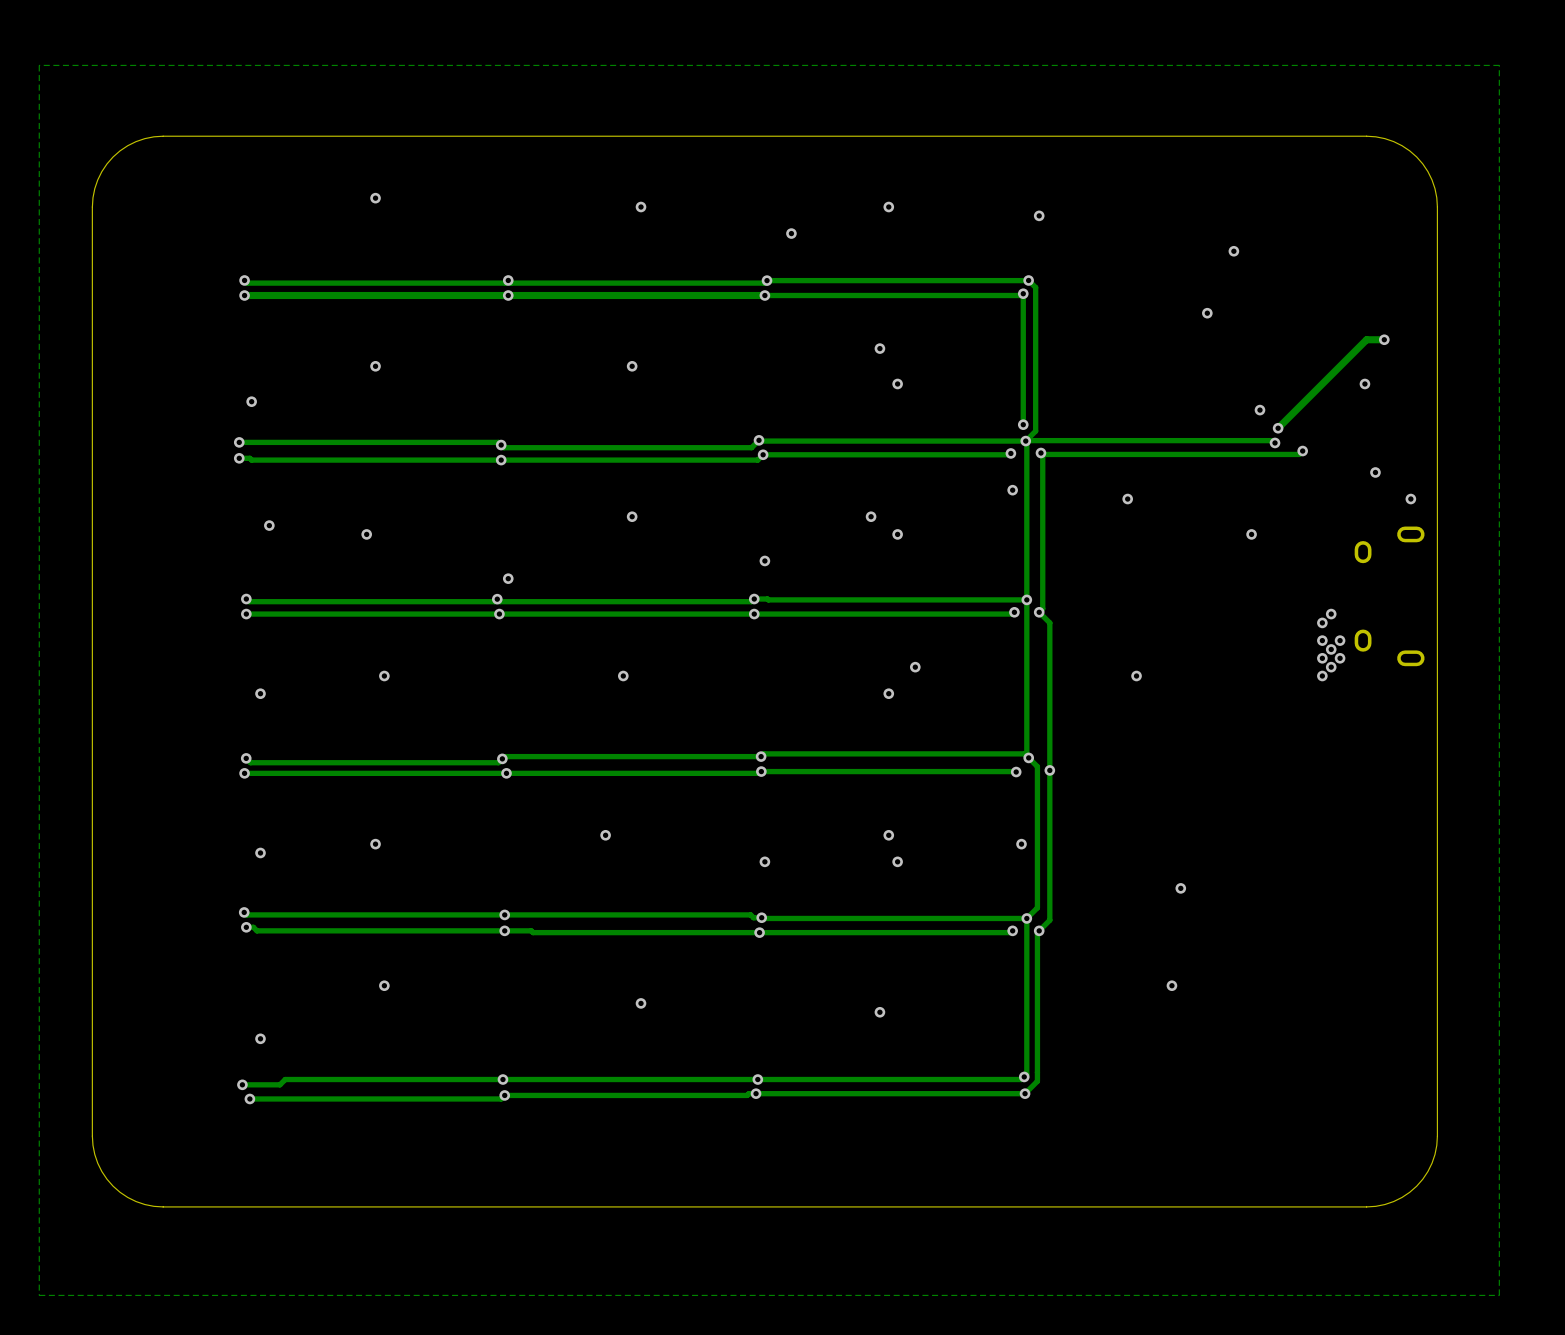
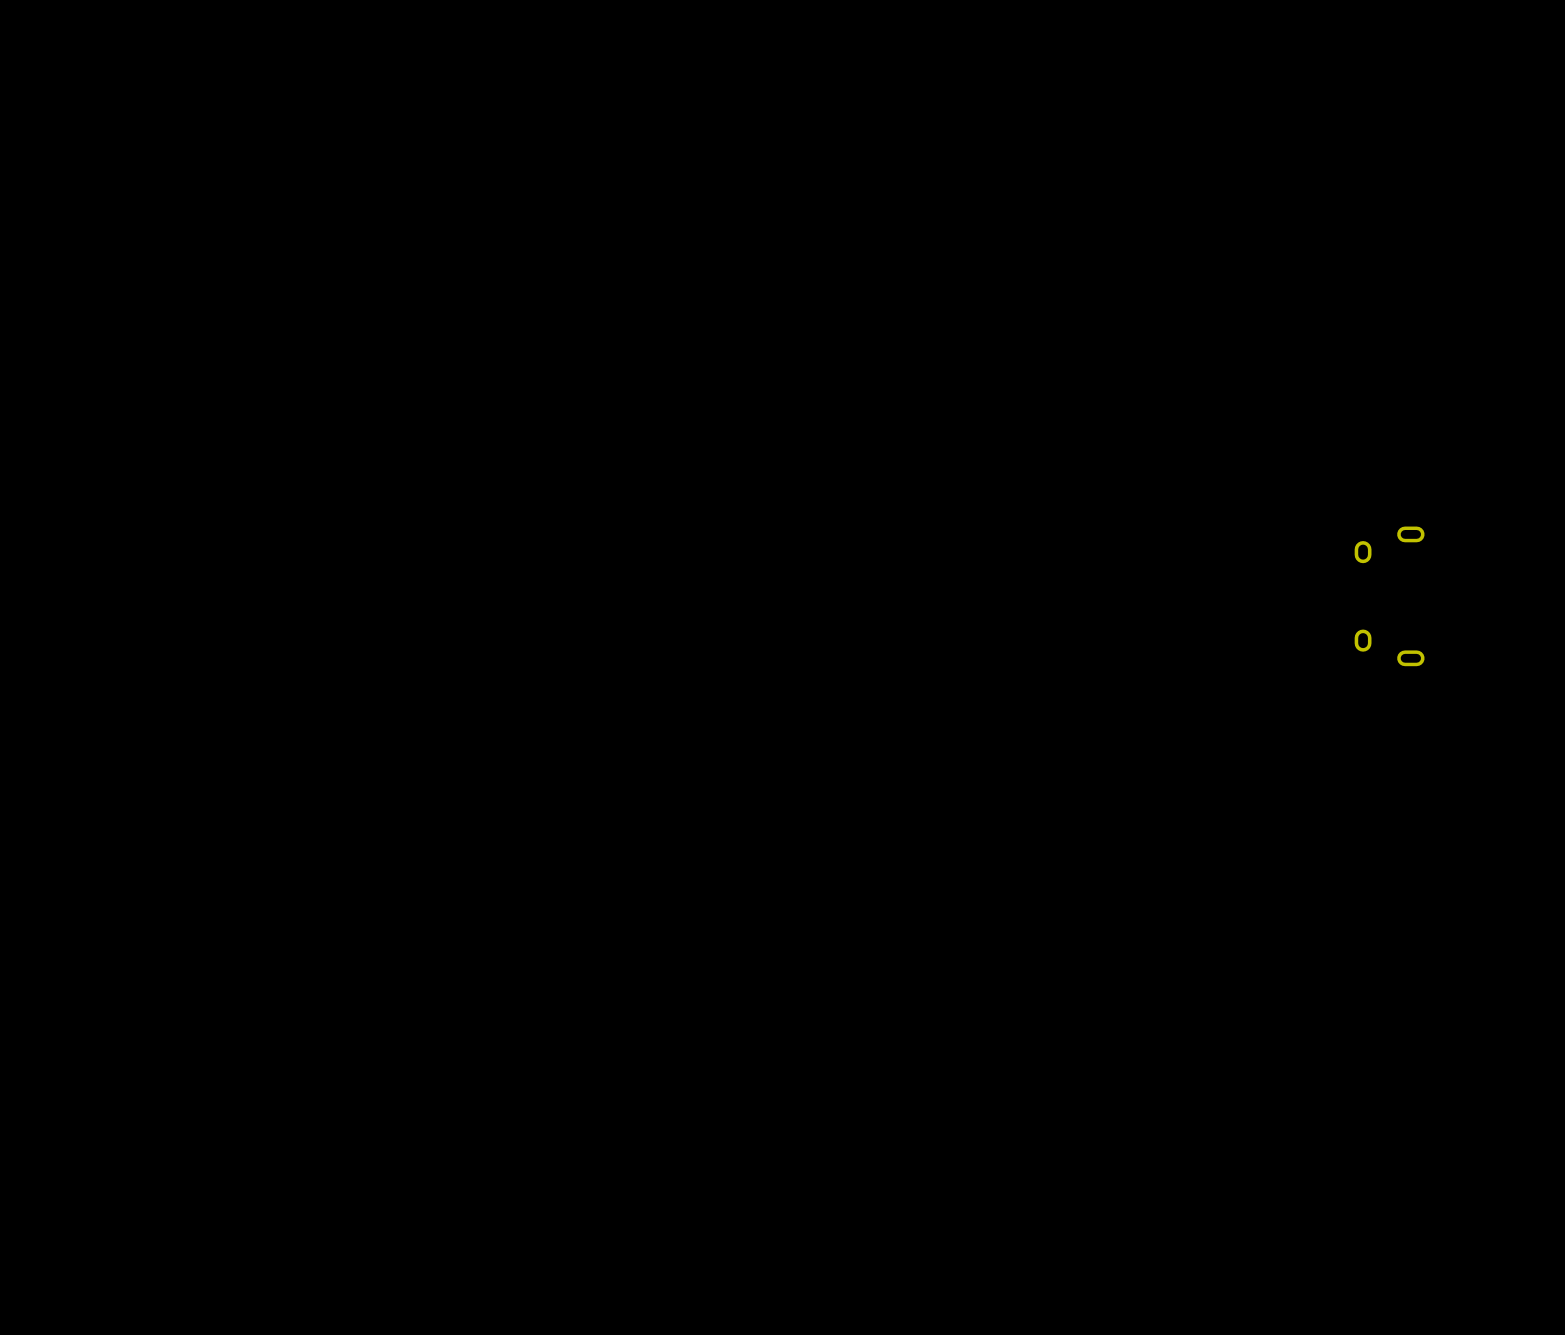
zone outline: (1499, 65) (39, 65) (39, 1295) (1499, 1295) (1499, 65) -> none
board edge: (1366, 136) (163, 136) (144, 138) (120, 150) (107, 163) (97, 179) (92, 207) (92, 1136) (94, 1154) (107, 1179) (120, 1192) (136, 1201) (163, 1206) (1366, 1206) (1384, 1204) (1409, 1192) (1422, 1179) (1432, 1163) (1437, 1136) (1437, 207) (1432, 179) (1416, 156) (1393, 141) (1366, 136) -> none
via: (375, 198) -> none
via: (641, 207) -> none
via: (888, 207) -> none
via: (1039, 215) -> none
via: (791, 233) -> none
via: (1233, 251) -> none
track: (244, 280) (247, 283) (505, 283) (508, 280) (510, 283) (1028, 280) -> none
via: (244, 280) -> none
via: (508, 280) -> none
via: (767, 280) -> none
track: (1028, 280) (1035, 287) (1035, 431) (1025, 441) -> none
via: (1028, 280) -> none
via: (1023, 293) -> none
track: (244, 295) (1021, 295) (1023, 293) (1023, 424) -> none
via: (244, 295) -> none
via: (508, 295) -> none
via: (764, 295) -> none
via: (1207, 313) -> none
track: (1384, 339) (1366, 339) (1278, 428) -> none
via: (1384, 339) -> none
via: (879, 348) -> none
via: (375, 366) -> none
via: (632, 366) -> none
via: (897, 383) -> none
via: (1364, 383) -> none
via: (251, 401) -> none
via: (1259, 410) -> none
via: (1023, 424) -> none
via: (1278, 428) -> none
via: (759, 440) -> none
track: (1026, 440) (1272, 440) (1275, 442) -> none
track: (1025, 441) (759, 440) (751, 447) (503, 447) (498, 442) (239, 442) -> none
track: (1025, 441) (1026, 756) -> none
via: (1025, 441) -> none
via: (239, 442) -> none
via: (1275, 442) -> none
via: (501, 445) -> none
track: (1302, 451) (1299, 454) (1042, 454) -> none
via: (1302, 451) -> none
track: (1010, 453) (763, 454) (757, 460) (251, 460) (249, 458) (239, 458) -> none
via: (1010, 453) -> none
track: (1040, 453) (1042, 454) (1042, 608) (1039, 612) (1049, 622) (1049, 920) (1037, 932) (1037, 1081) (1025, 1093) (748, 1093) (747, 1095) (504, 1095) (501, 1098) (249, 1098) -> none
via: (1040, 453) -> none
via: (763, 454) -> none
via: (239, 458) -> none
via: (501, 460) -> none
via: (1375, 472) -> none
via: (1012, 490) -> none
via: (1127, 499) -> none
via: (1410, 499) -> none
via: (632, 516) -> none
via: (871, 516) -> none
via: (269, 525) -> none
via: (366, 534) -> none
via: (897, 534) -> none
via: (1251, 534) -> none
via: (764, 560) -> none
via: (508, 578) -> none
track: (246, 599) (249, 601) (494, 601) (497, 599) (499, 601) (751, 601) (754, 599) (1026, 599) -> none
via: (246, 599) -> none
via: (497, 599) -> none
via: (754, 599) -> none
via: (1026, 599) -> none
track: (1014, 612) (1012, 614) (246, 614) -> none
via: (1014, 612) -> none
via: (1039, 612) -> none
via: (246, 614) -> none
via: (499, 614) -> none
via: (754, 614) -> none
via: (1331, 614) -> none
via: (1322, 622) -> none
via: (1322, 640) -> none
via: (1340, 640) -> none
via: (1331, 649) -> none
via: (1322, 658) -> none
via: (1340, 658) -> none
via: (915, 667) -> none
via: (1331, 667) -> none
via: (384, 676) -> none
via: (623, 676) -> none
via: (1136, 676) -> none
via: (1322, 676) -> none
via: (260, 693) -> none
via: (888, 693) -> none
via: (761, 756) -> none
via: (1028, 757) -> none
track: (246, 758) (250, 762) (498, 762) (504, 756) (1024, 753) (1037, 766) (1037, 907) (1026, 918) -> none
via: (246, 758) -> none
via: (502, 758) -> none
via: (1049, 770) -> none
via: (761, 771) -> none
track: (1016, 772) (244, 773) -> none
via: (1016, 772) -> none
via: (244, 773) -> none
via: (506, 773) -> none
via: (605, 835) -> none
via: (888, 835) -> none
via: (375, 844) -> none
via: (1021, 844) -> none
via: (260, 852) -> none
via: (764, 861) -> none
via: (897, 861) -> none
via: (1180, 888) -> none
track: (244, 912) (246, 914) (750, 914) (753, 917) (762, 918) (1026, 918) -> none
via: (244, 912) -> none
via: (504, 914) -> none
via: (761, 917) -> none
track: (1026, 918) (1026, 1074) (1021, 1079) (285, 1079) (279, 1084) (242, 1084) -> none
via: (1026, 918) -> none
track: (246, 927) (253, 927) (256, 930) (531, 930) (533, 932) (1010, 932) (1012, 930) -> none
via: (246, 927) -> none
via: (504, 930) -> none
via: (1012, 930) -> none
via: (1039, 930) -> none
via: (759, 932) -> none
via: (384, 985) -> none
via: (1171, 985) -> none
via: (641, 1003) -> none
via: (879, 1012) -> none
via: (260, 1038) -> none
via: (1024, 1076) -> none
via: (502, 1079) -> none
via: (757, 1079) -> none
via: (242, 1084) -> none
via: (756, 1093) -> none
via: (1025, 1093) -> none
via: (504, 1095) -> none
via: (249, 1098) -> none

